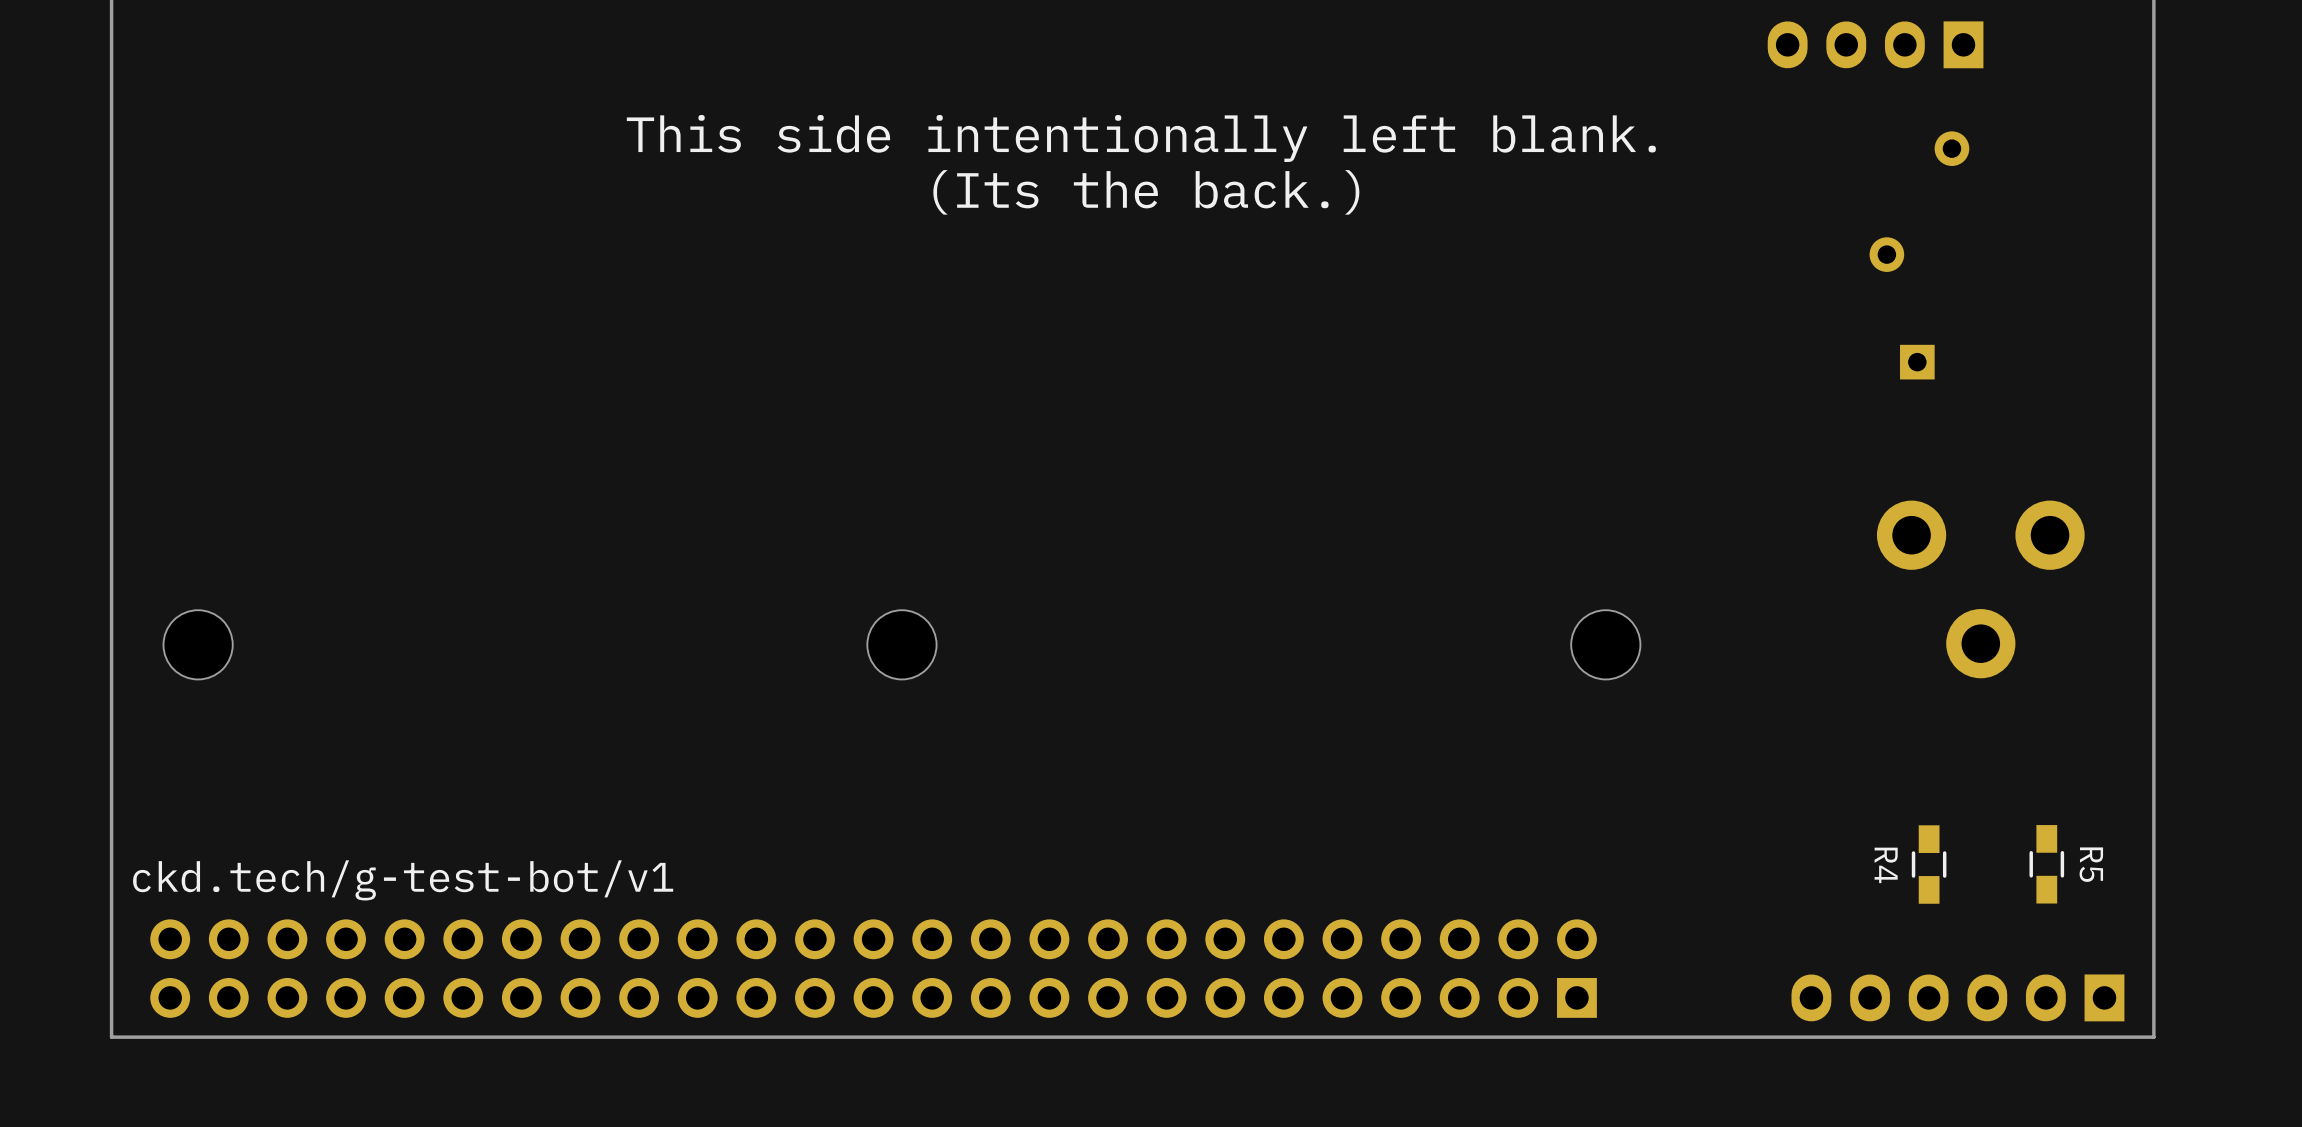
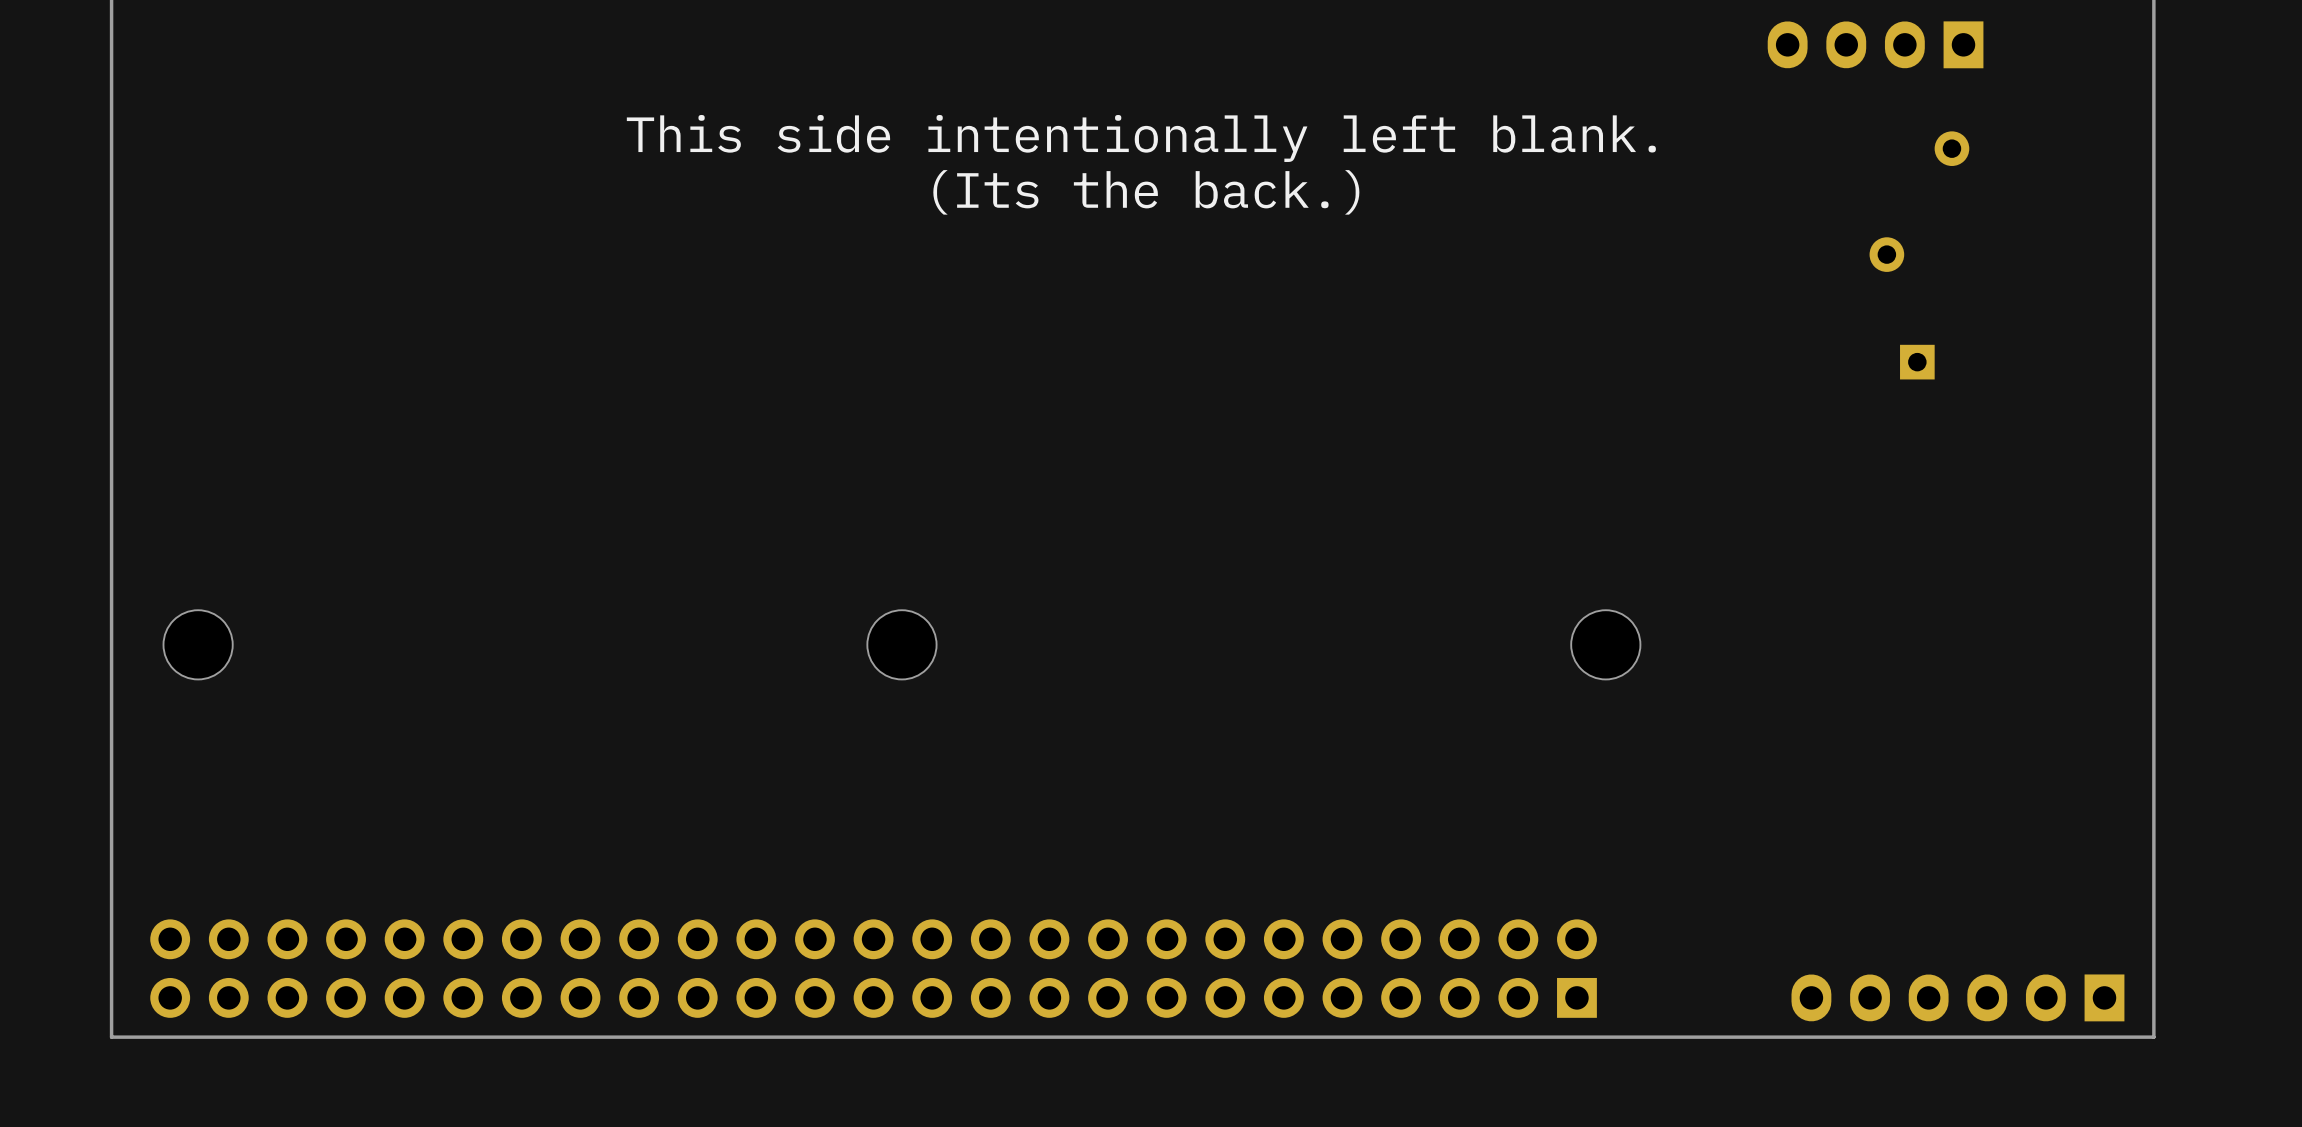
part: (1980, 589) -> none
R4: (1929, 864) -> none
R5: (2046, 864) -> none
text: ckd.tech/g-test-bot/v1 (403, 880) -> none

